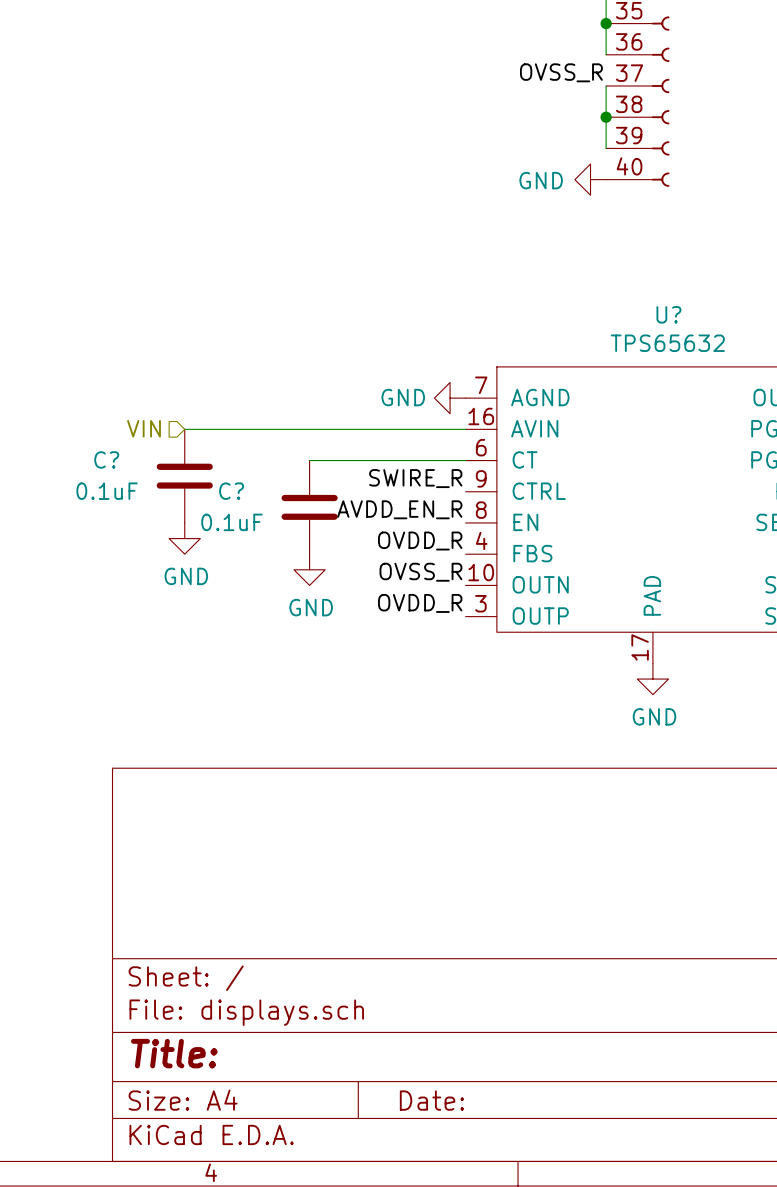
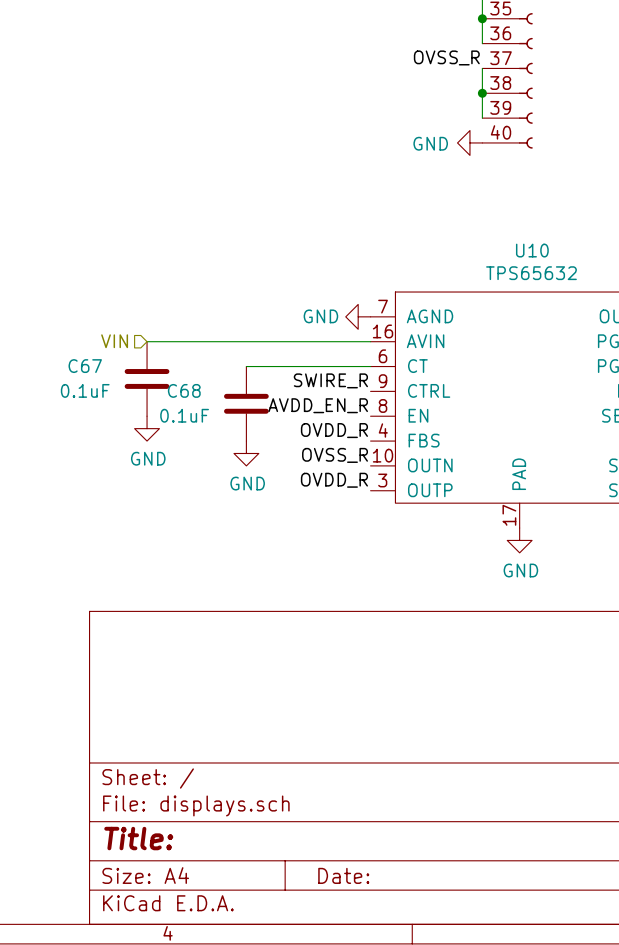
U? name: U? (668, 314) -> U10 (532, 250)
C? name: C? (106, 459) -> C67 (85, 366)
C? name: C? (231, 491) -> C68 (184, 390)

